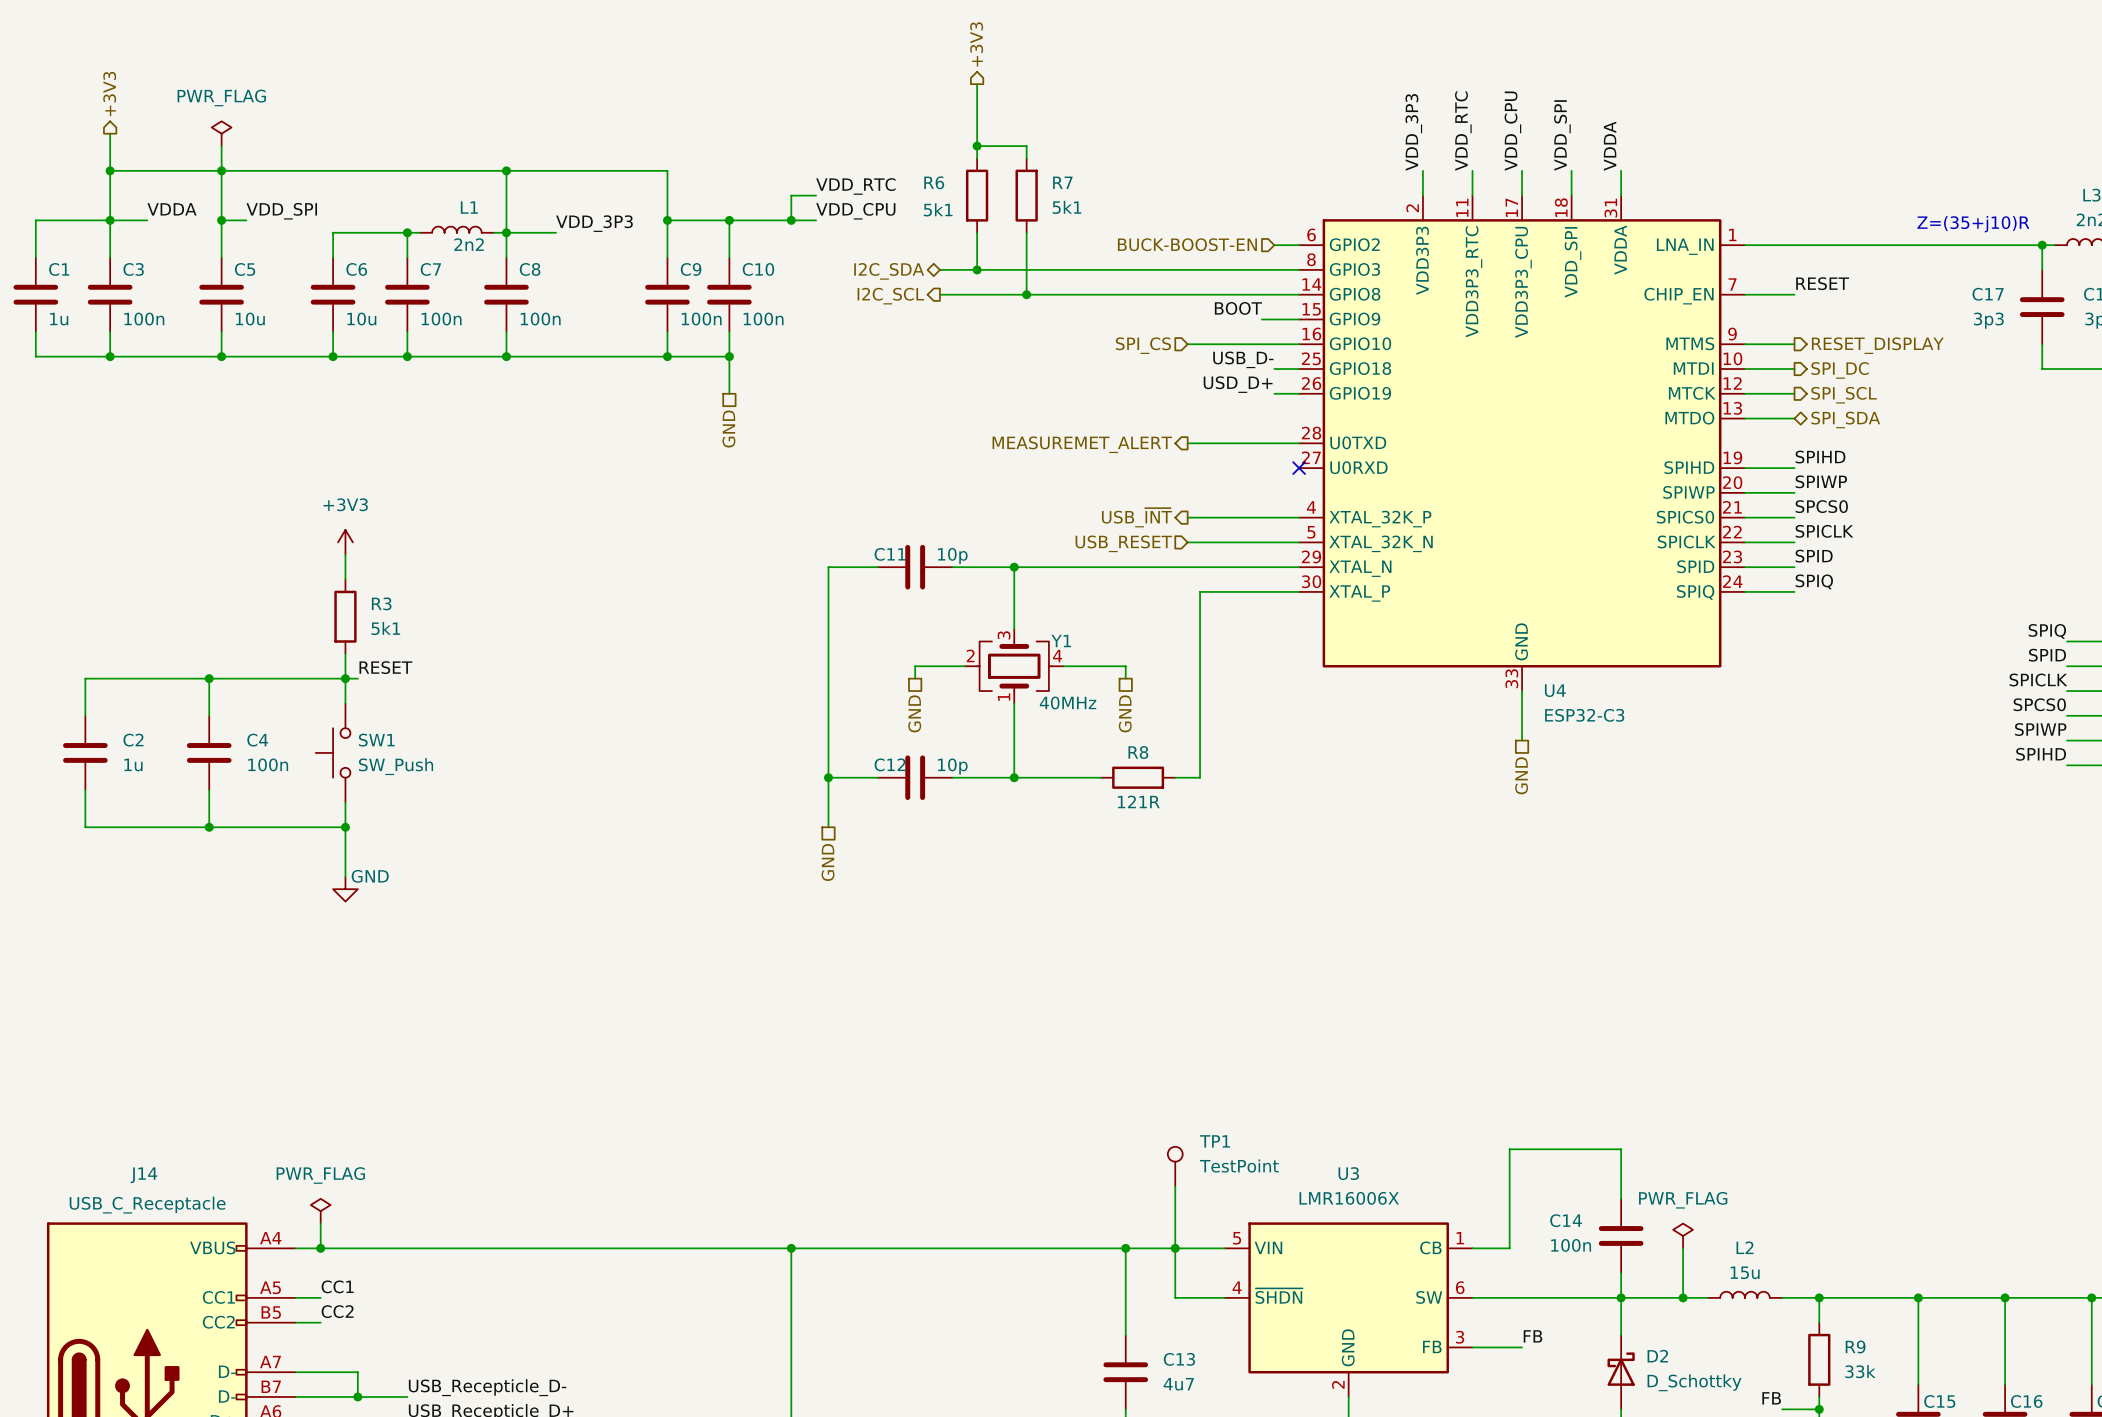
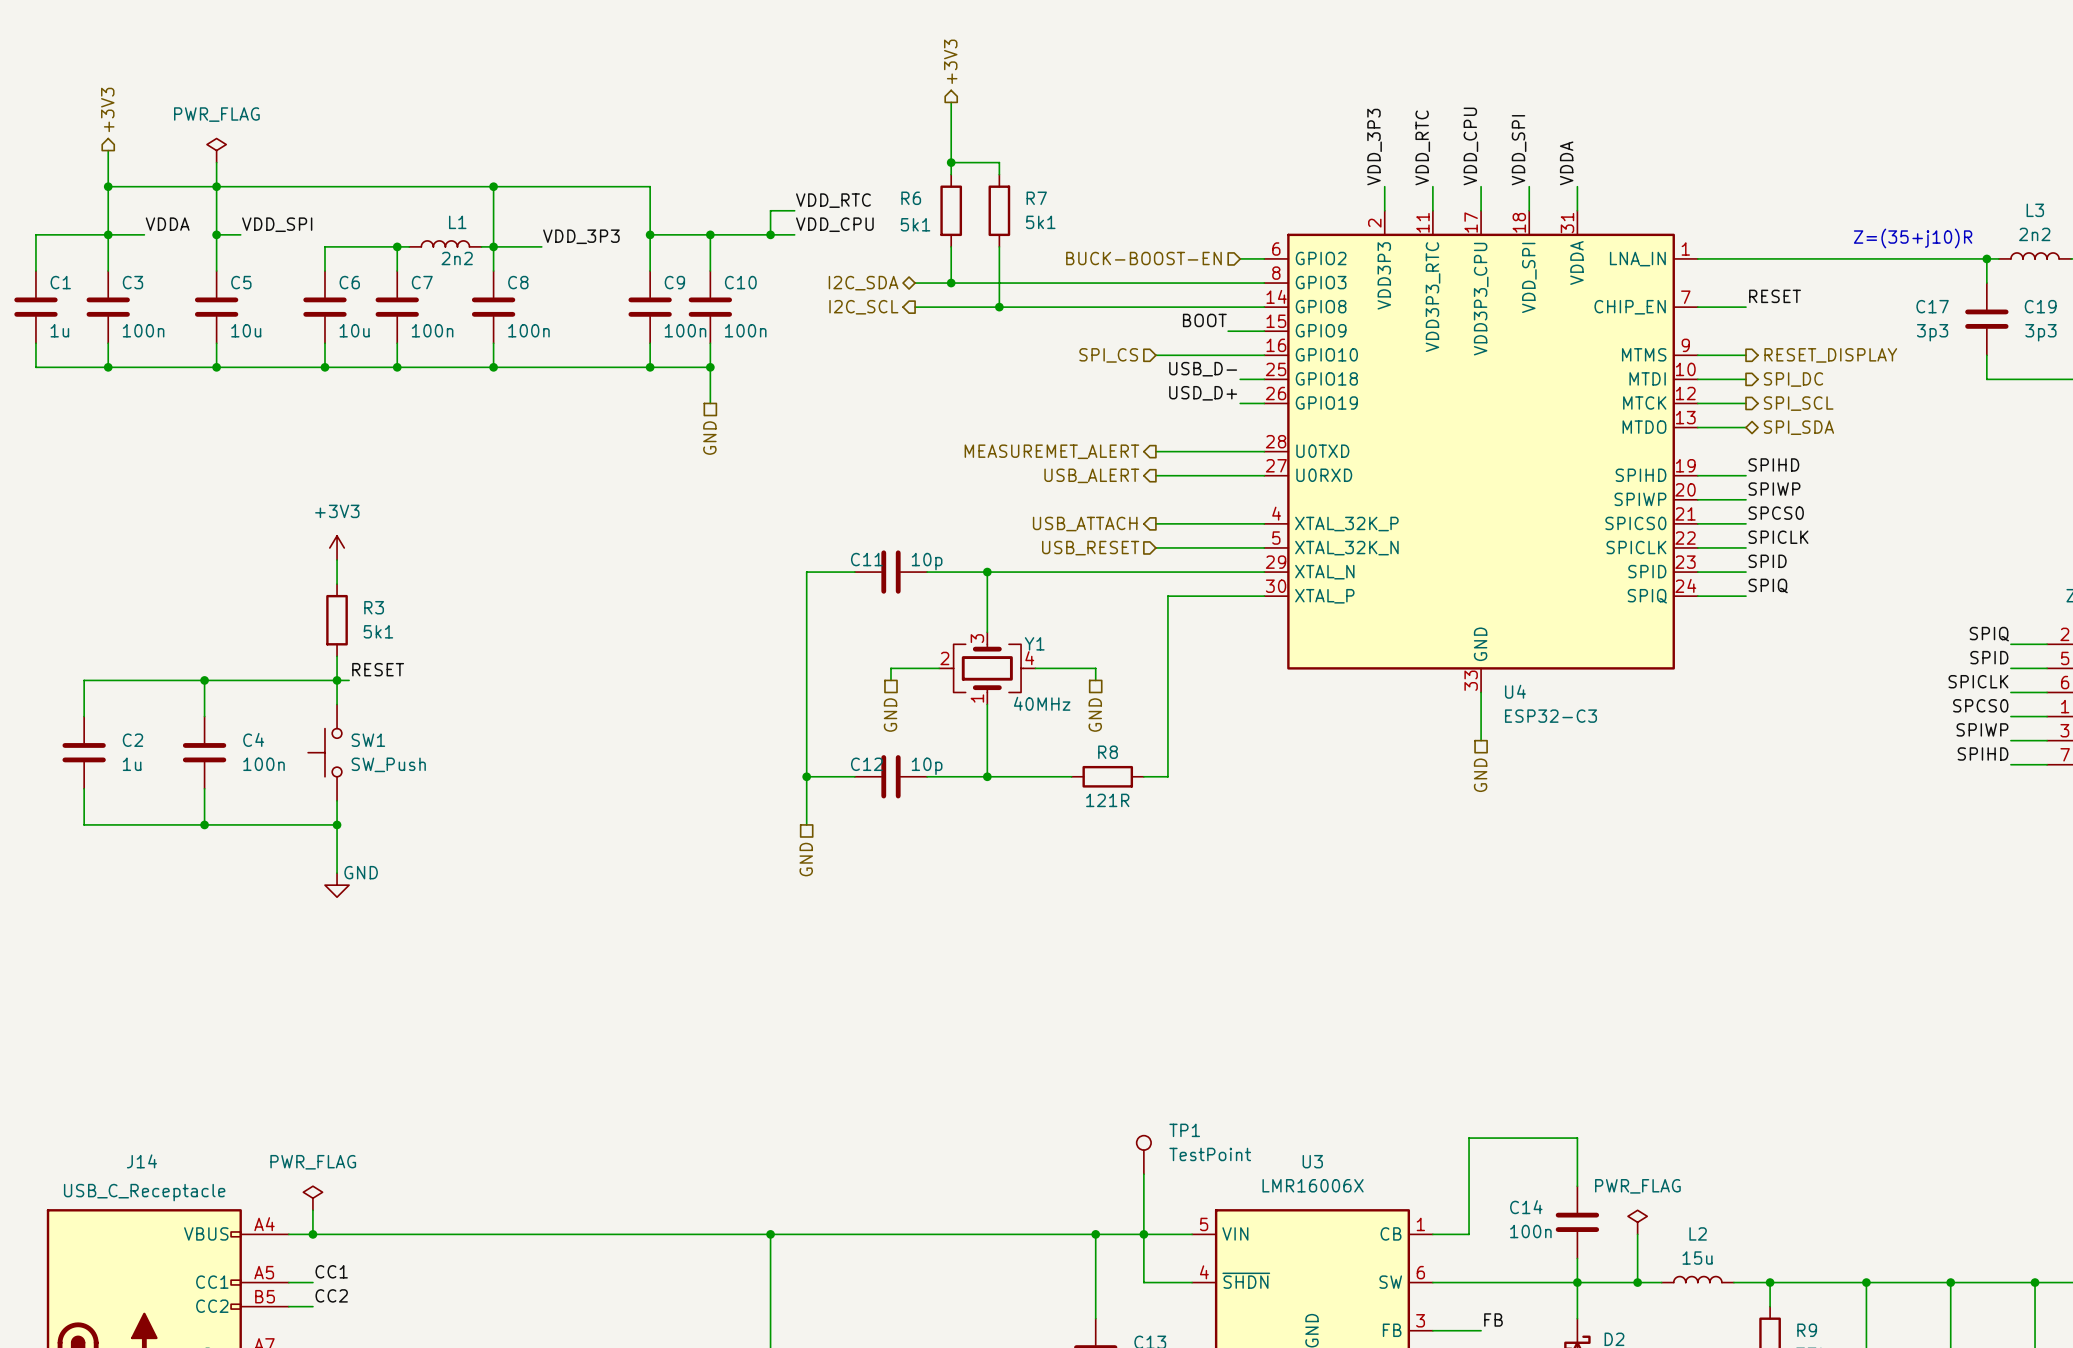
wire: none -> (1155, 475) (1264, 475)
no-connect mark: (1299, 468) -> none
hierarchical label: none -> USB_ALERT (1091, 475)
hierarchical label: USB_~{INT} (1136, 517) -> USB_ATTACH (1085, 524)

